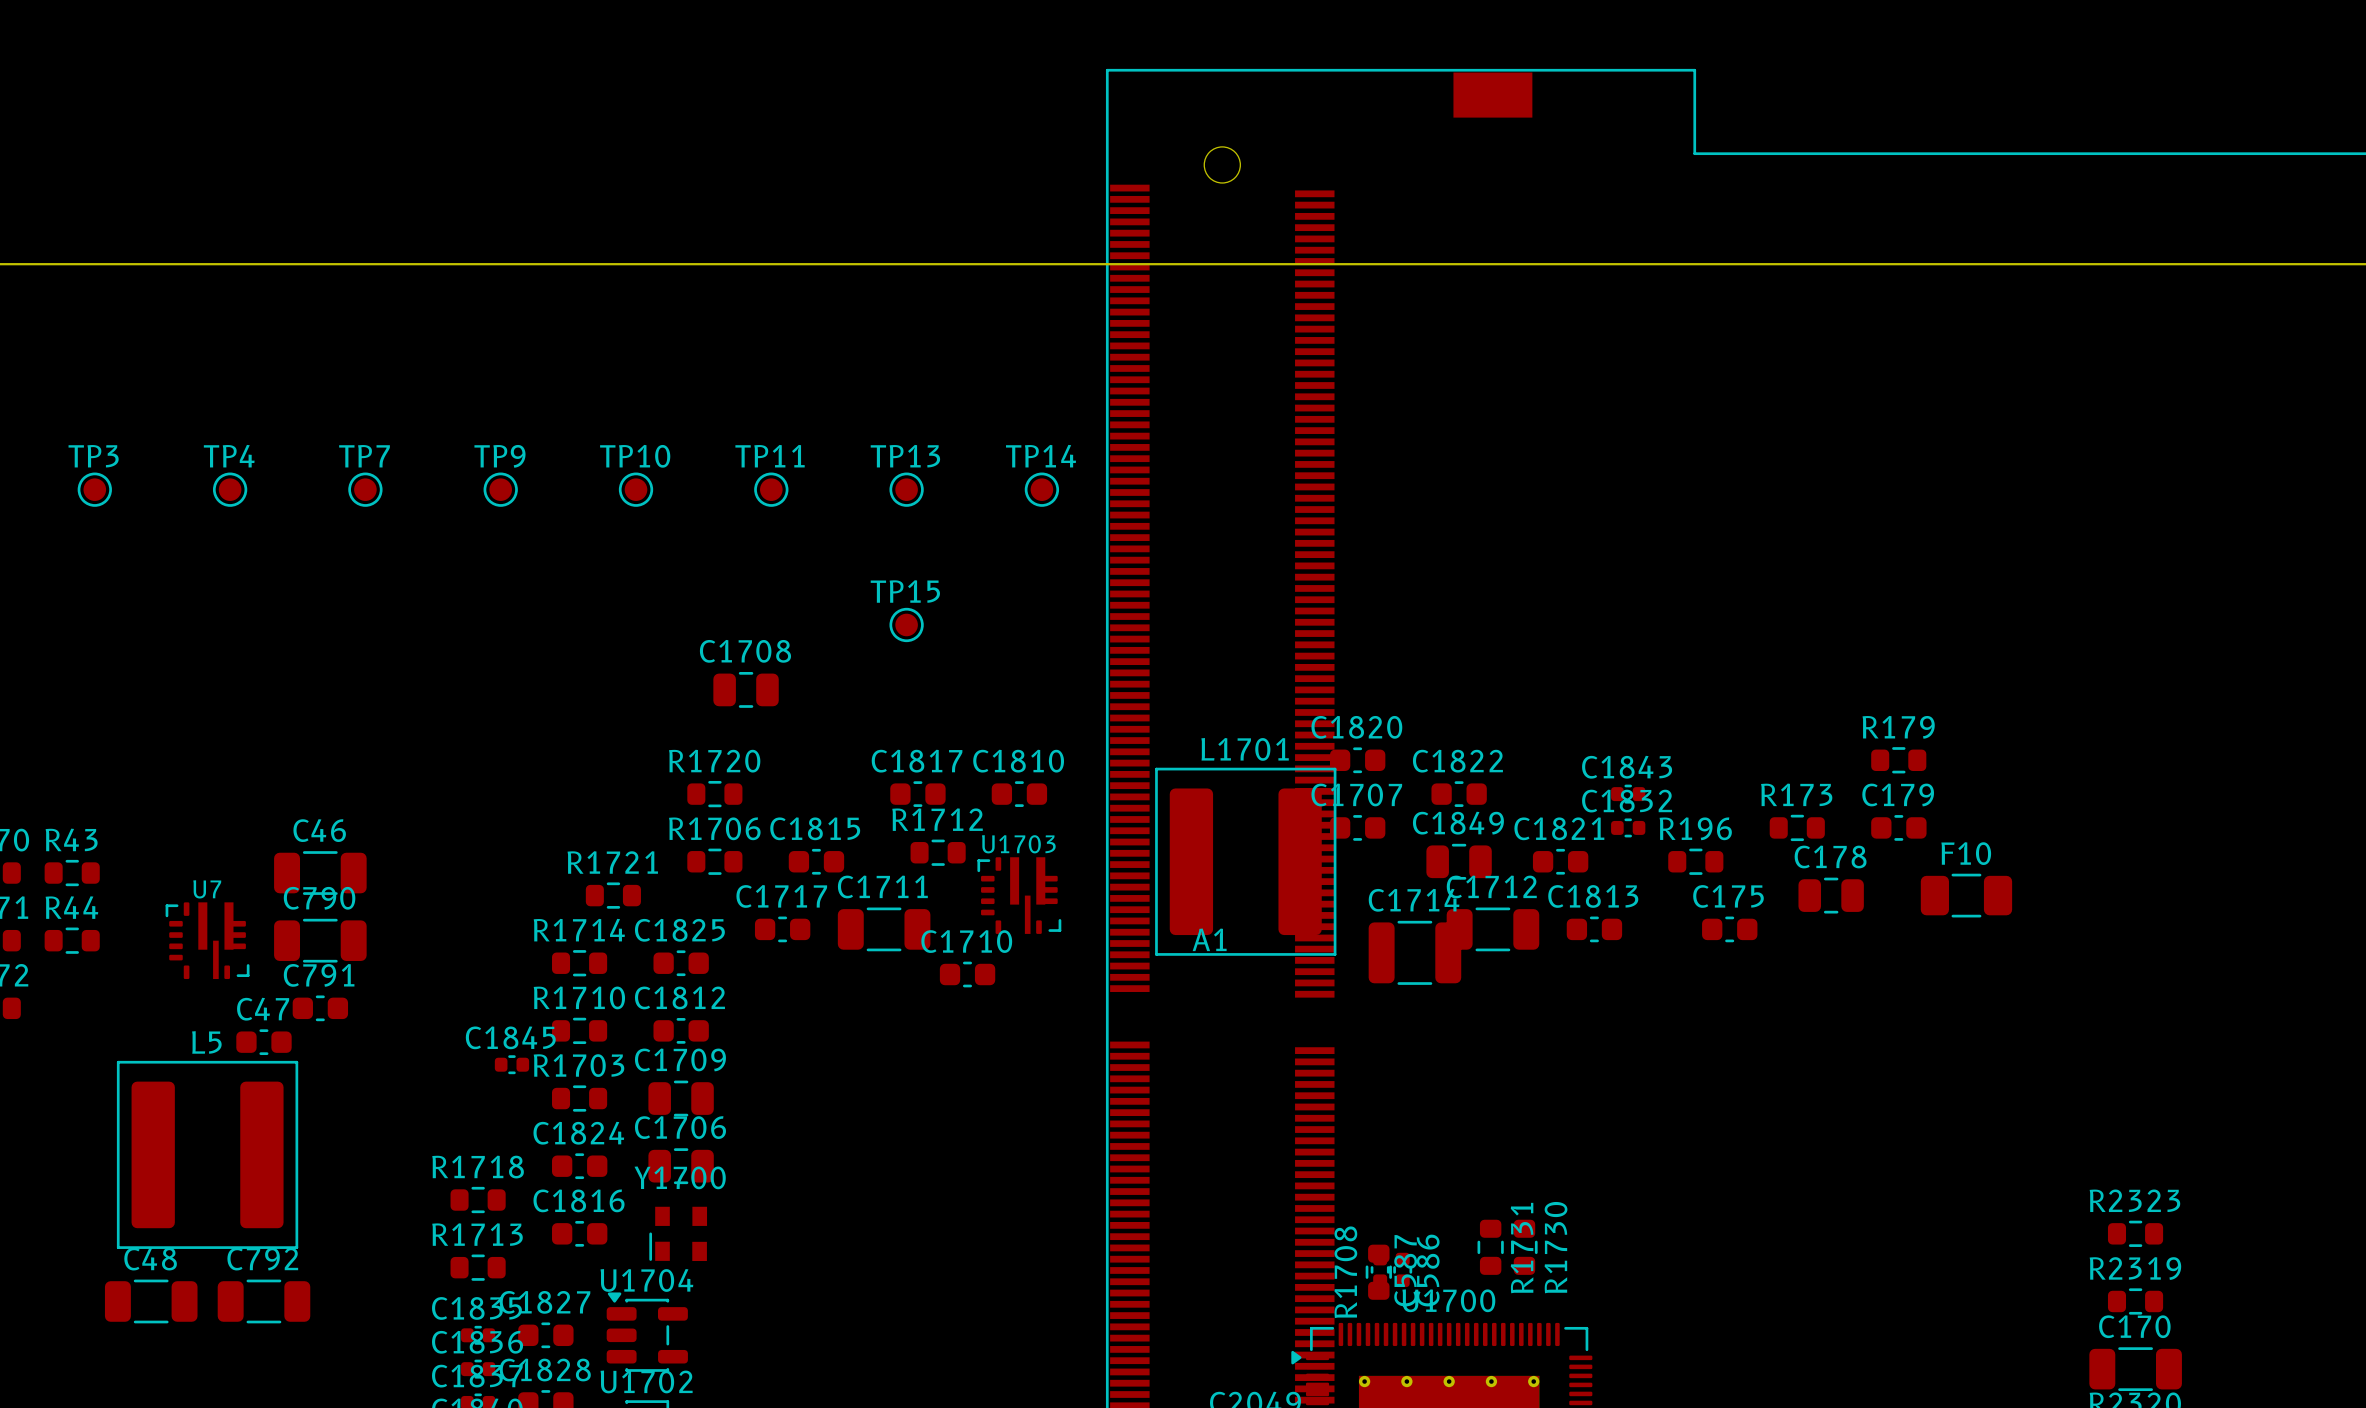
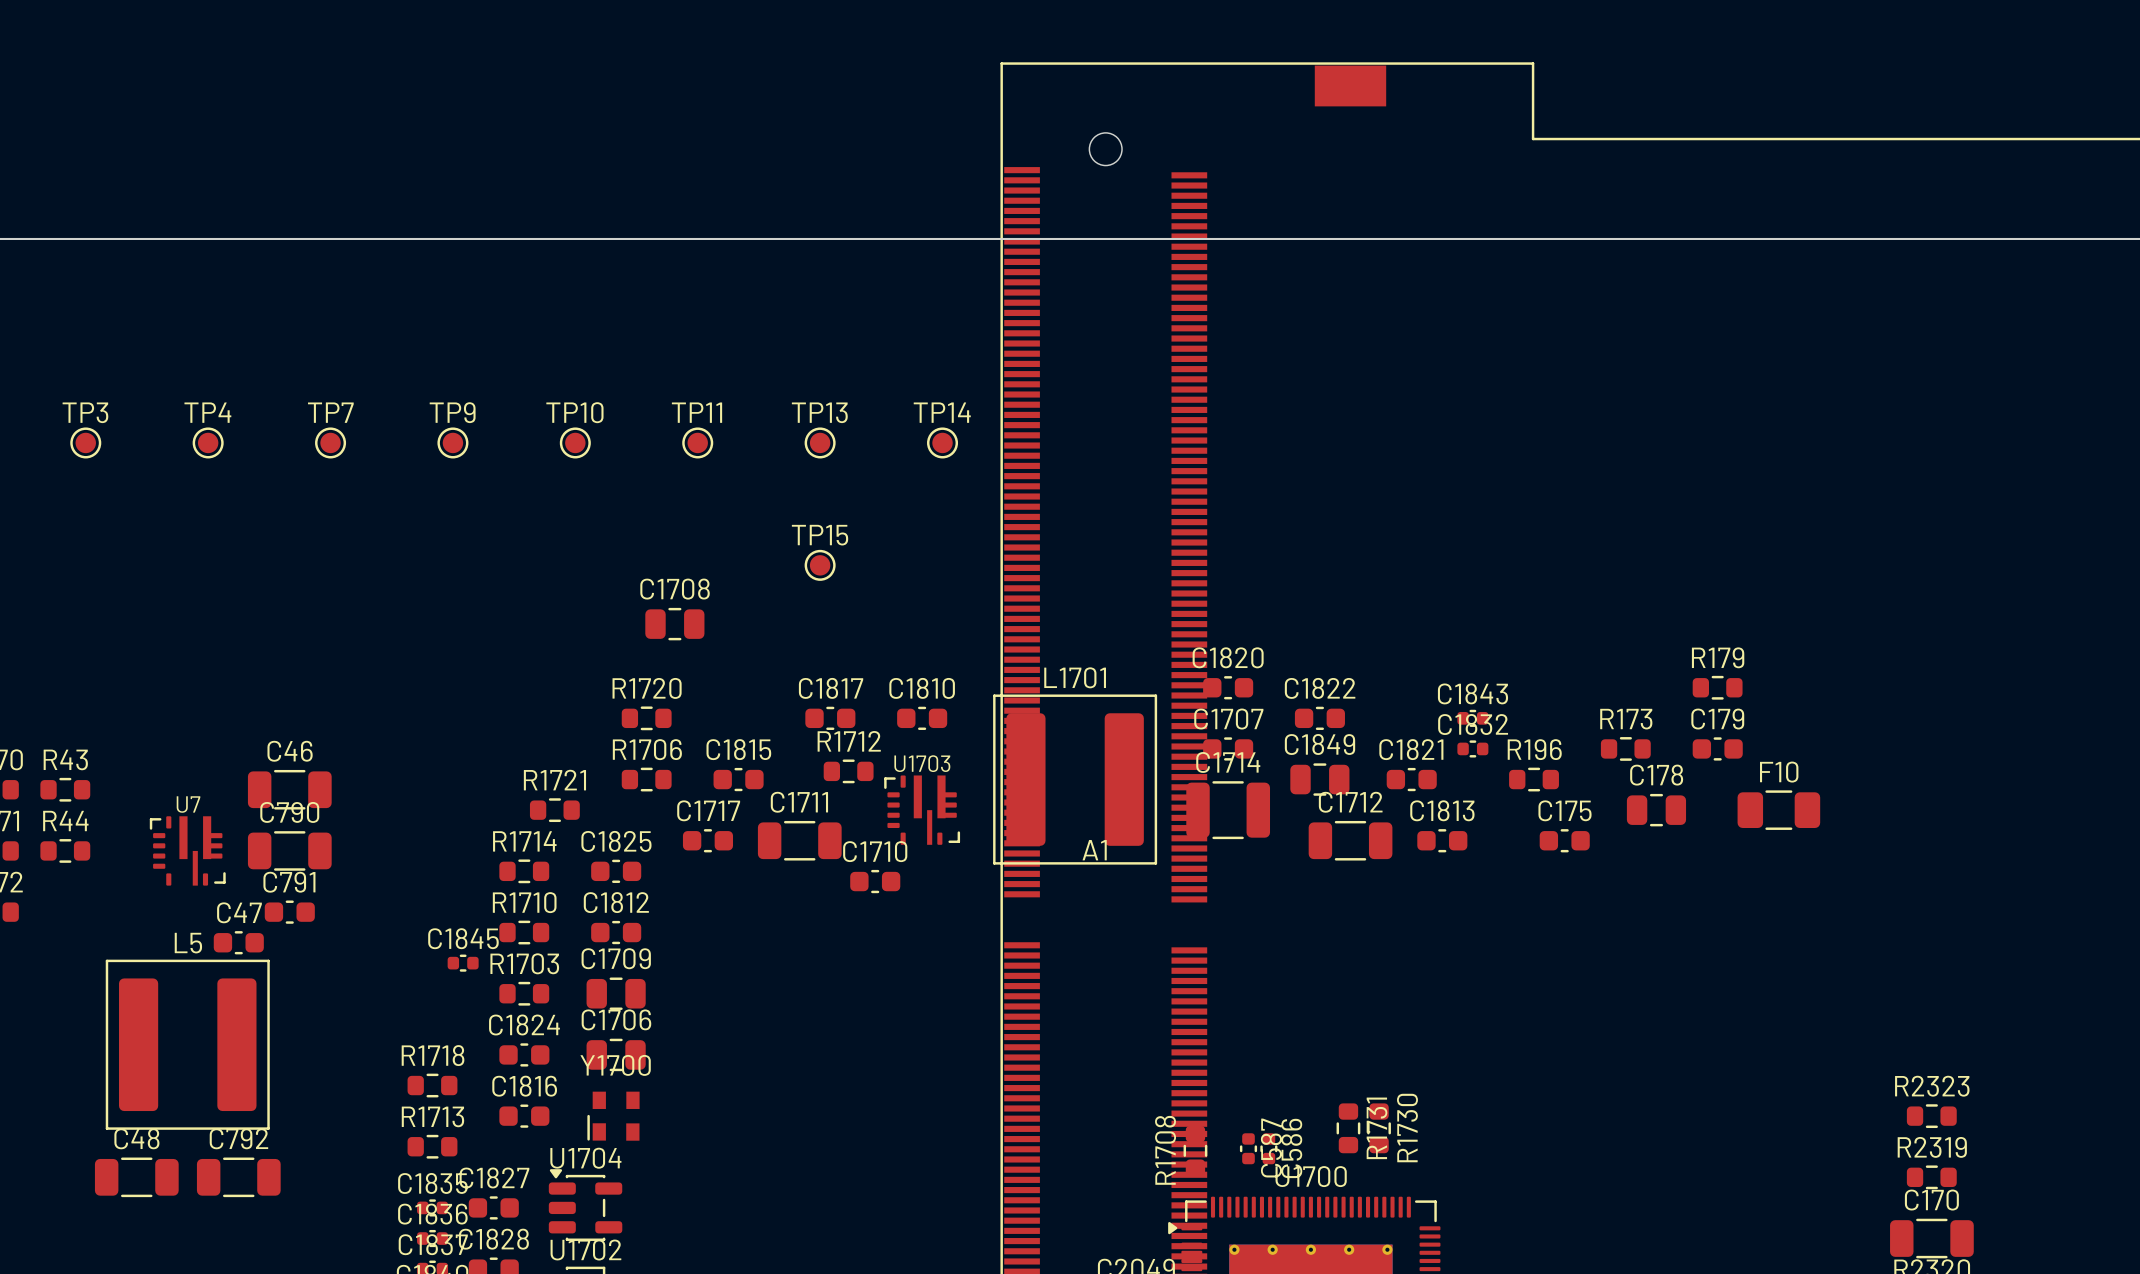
L1701 position: (1245, 861) -> (1075, 779)
C1714 position: (1414, 952) -> (1228, 810)
R1708 position: (1378, 1272) -> (1195, 1150)

